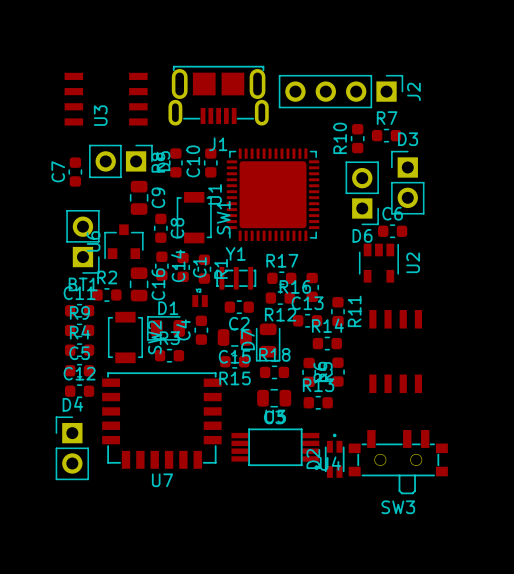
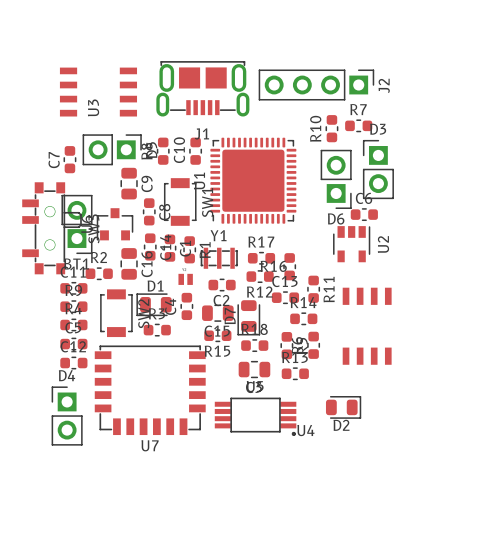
D2 footprint: [324, 433, 345, 478] -> [325, 396, 362, 419]
D2 name position: D2 (313, 459) -> D2 (341, 425)
SW3 rotation: 0° (398, 462) -> 90° counterclockwise (52, 228)
SW3 position: (398, 462) -> (52, 228)

